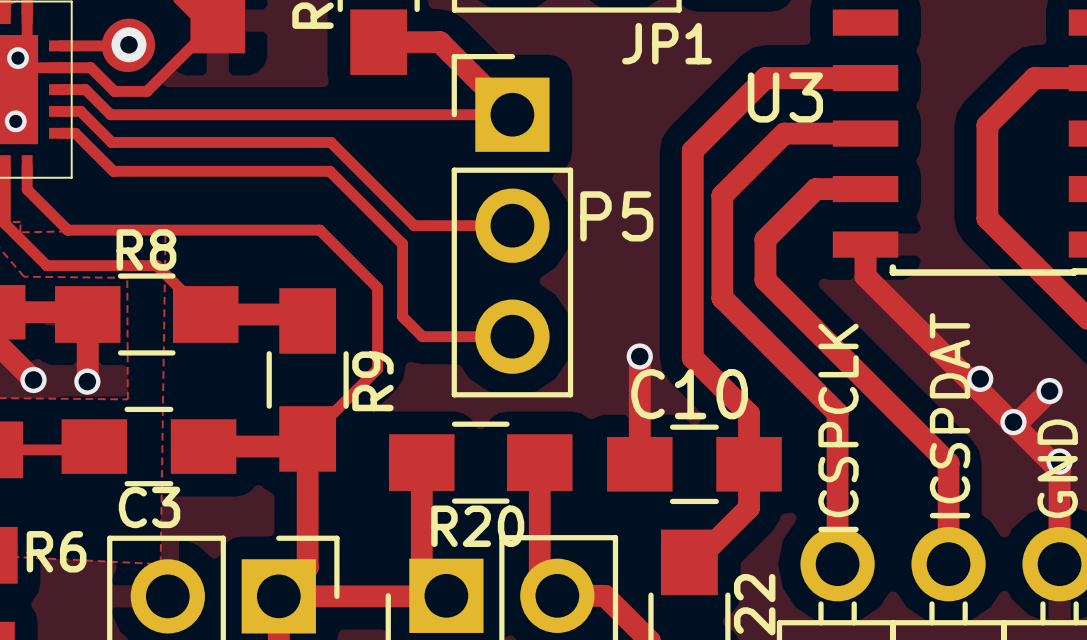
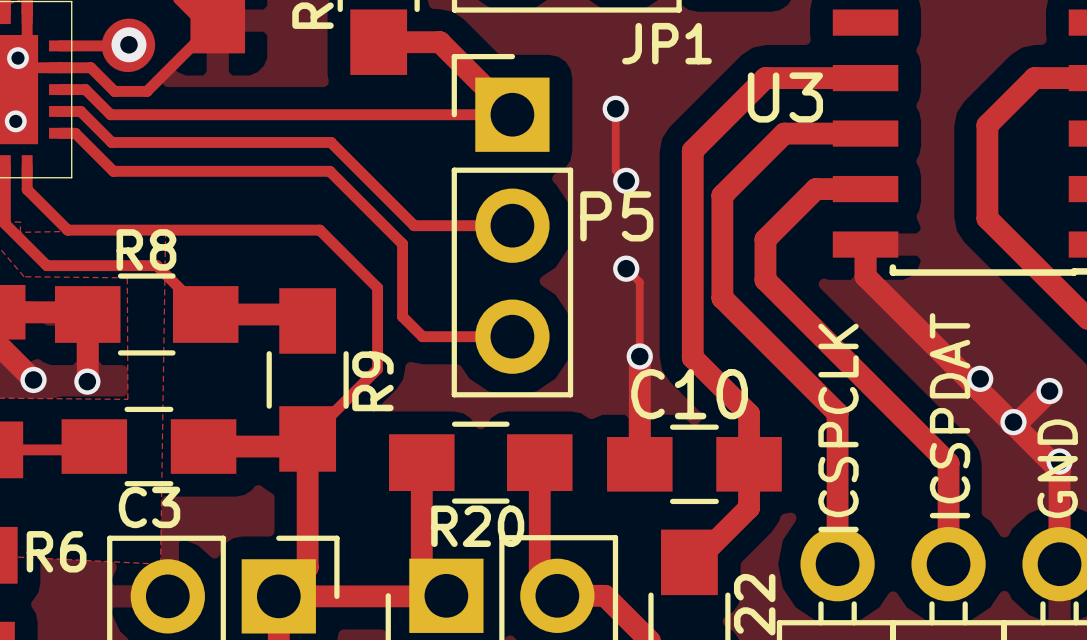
track: none -> (615, 108) (615, 170) (626, 180)
via: none -> (615, 108)
via: none -> (626, 180)
track: none -> (626, 268) (639, 282) (639, 356)
via: none -> (626, 268)

